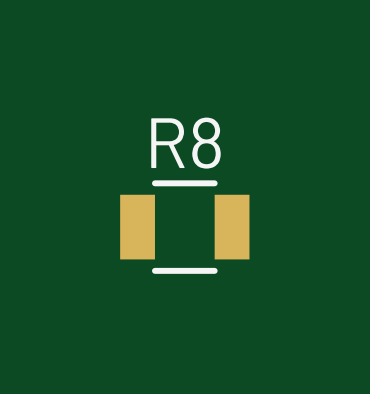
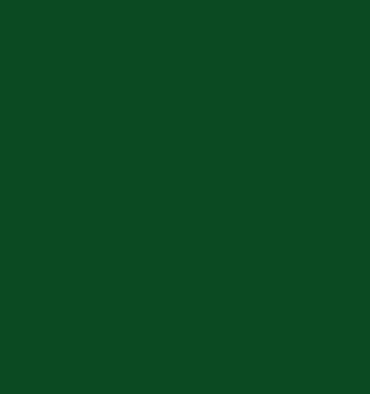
R8: (184, 227) -> none

